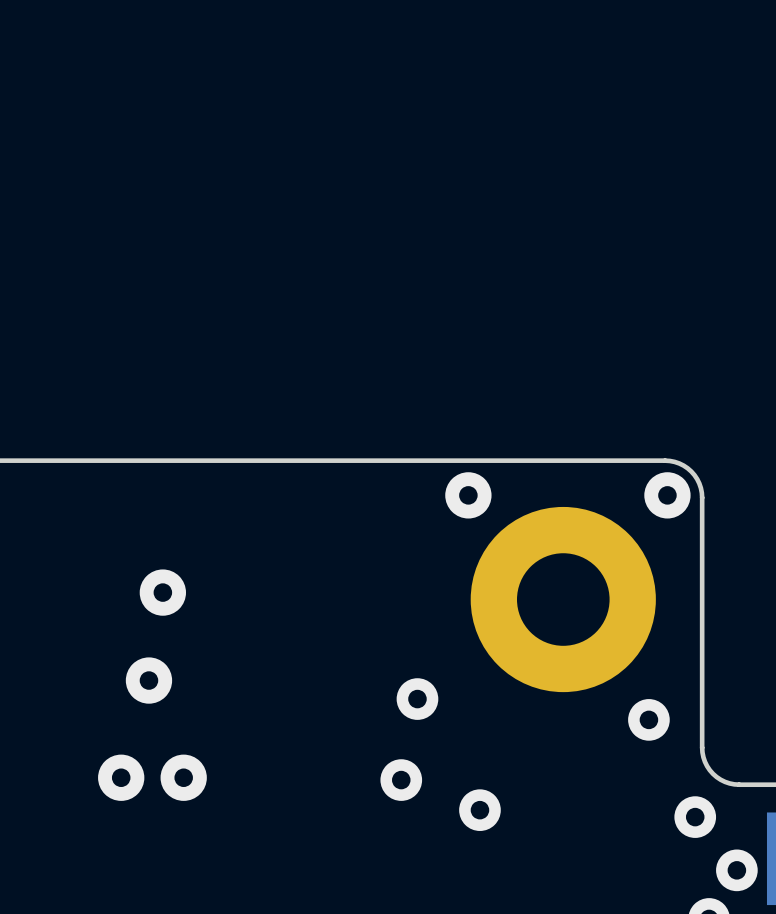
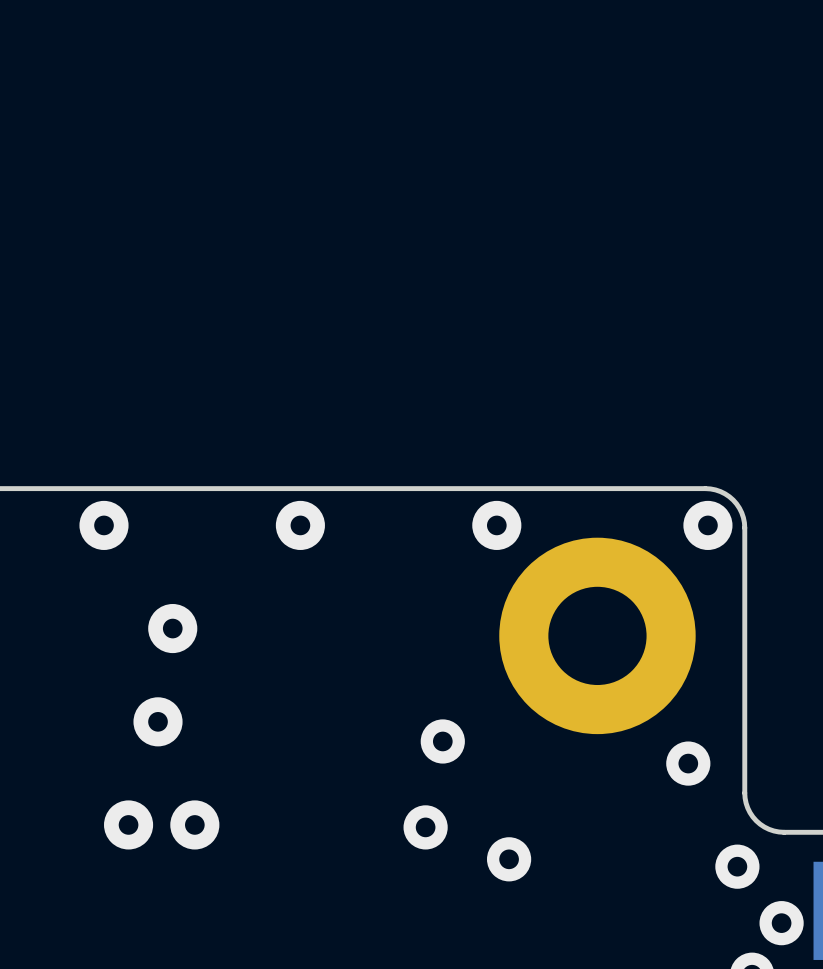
via: none -> (104, 525)
via: none -> (300, 525)

